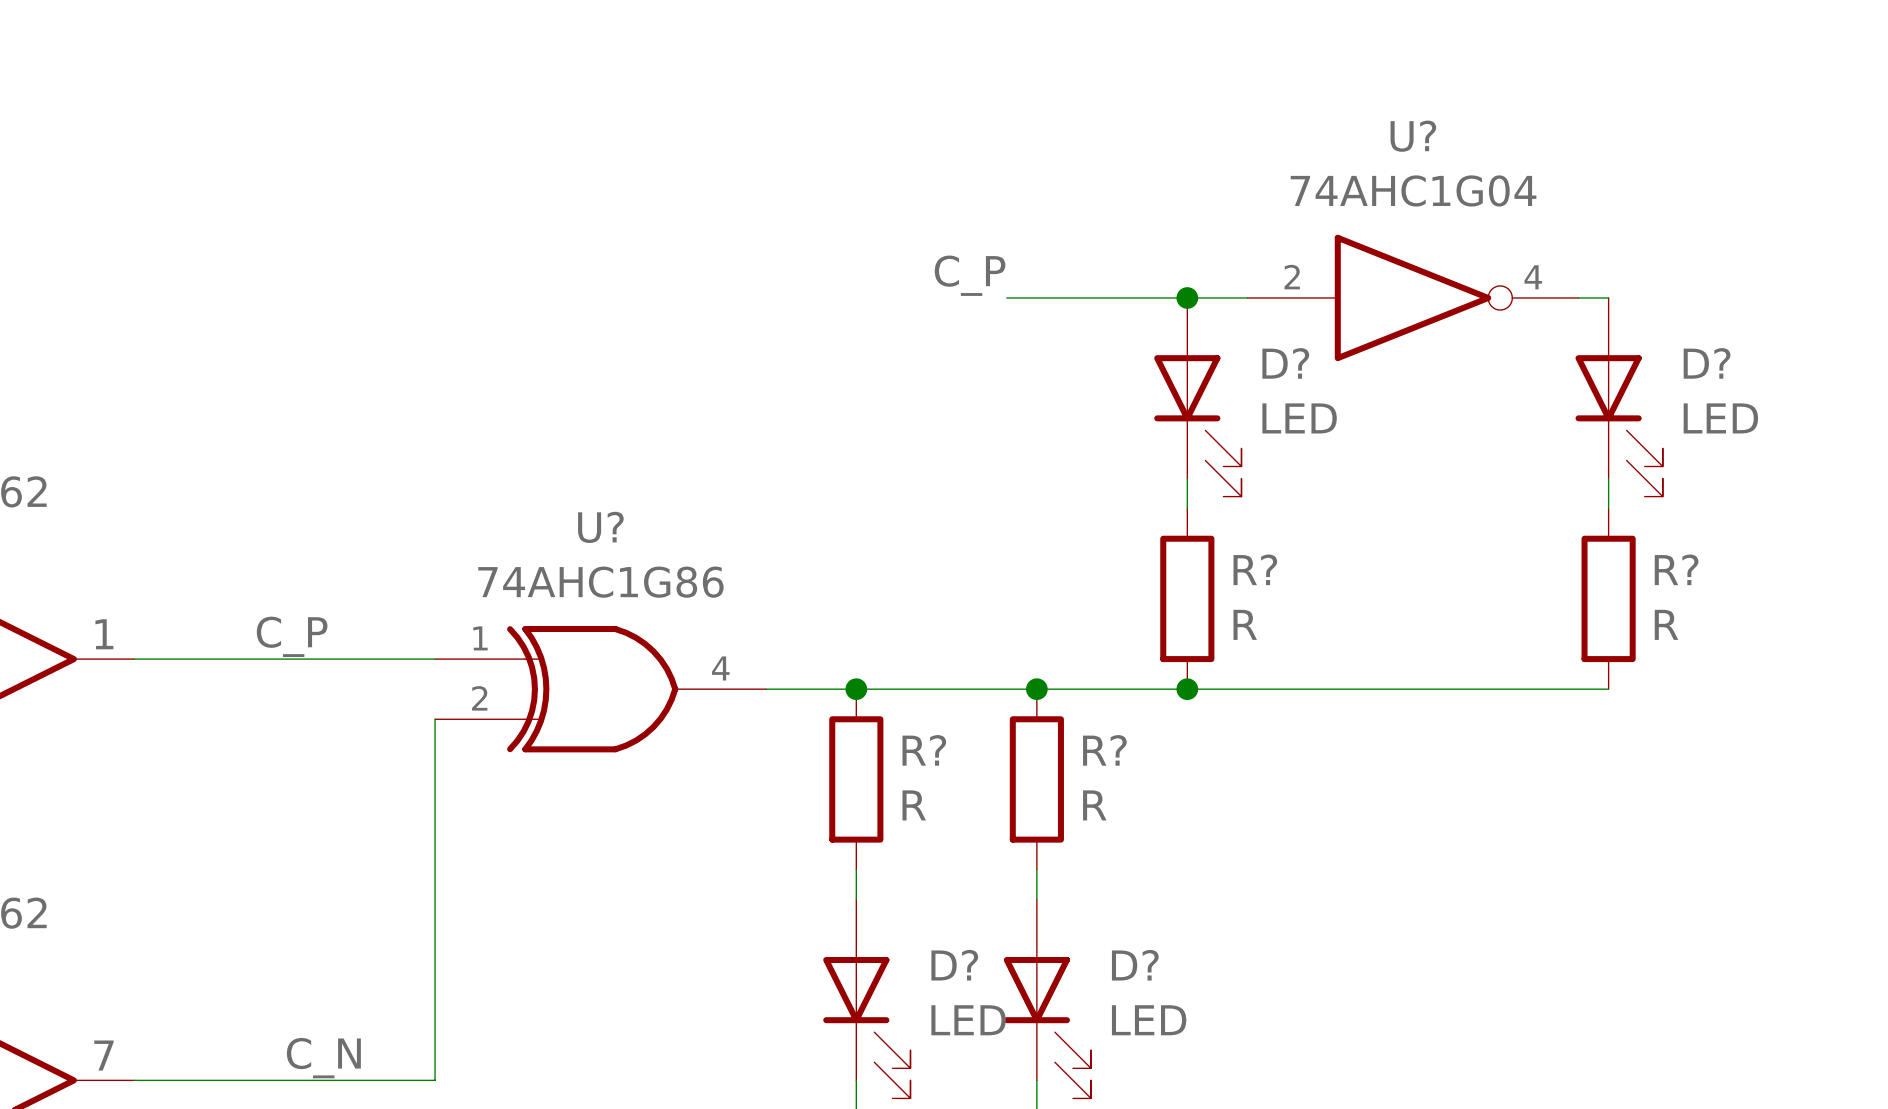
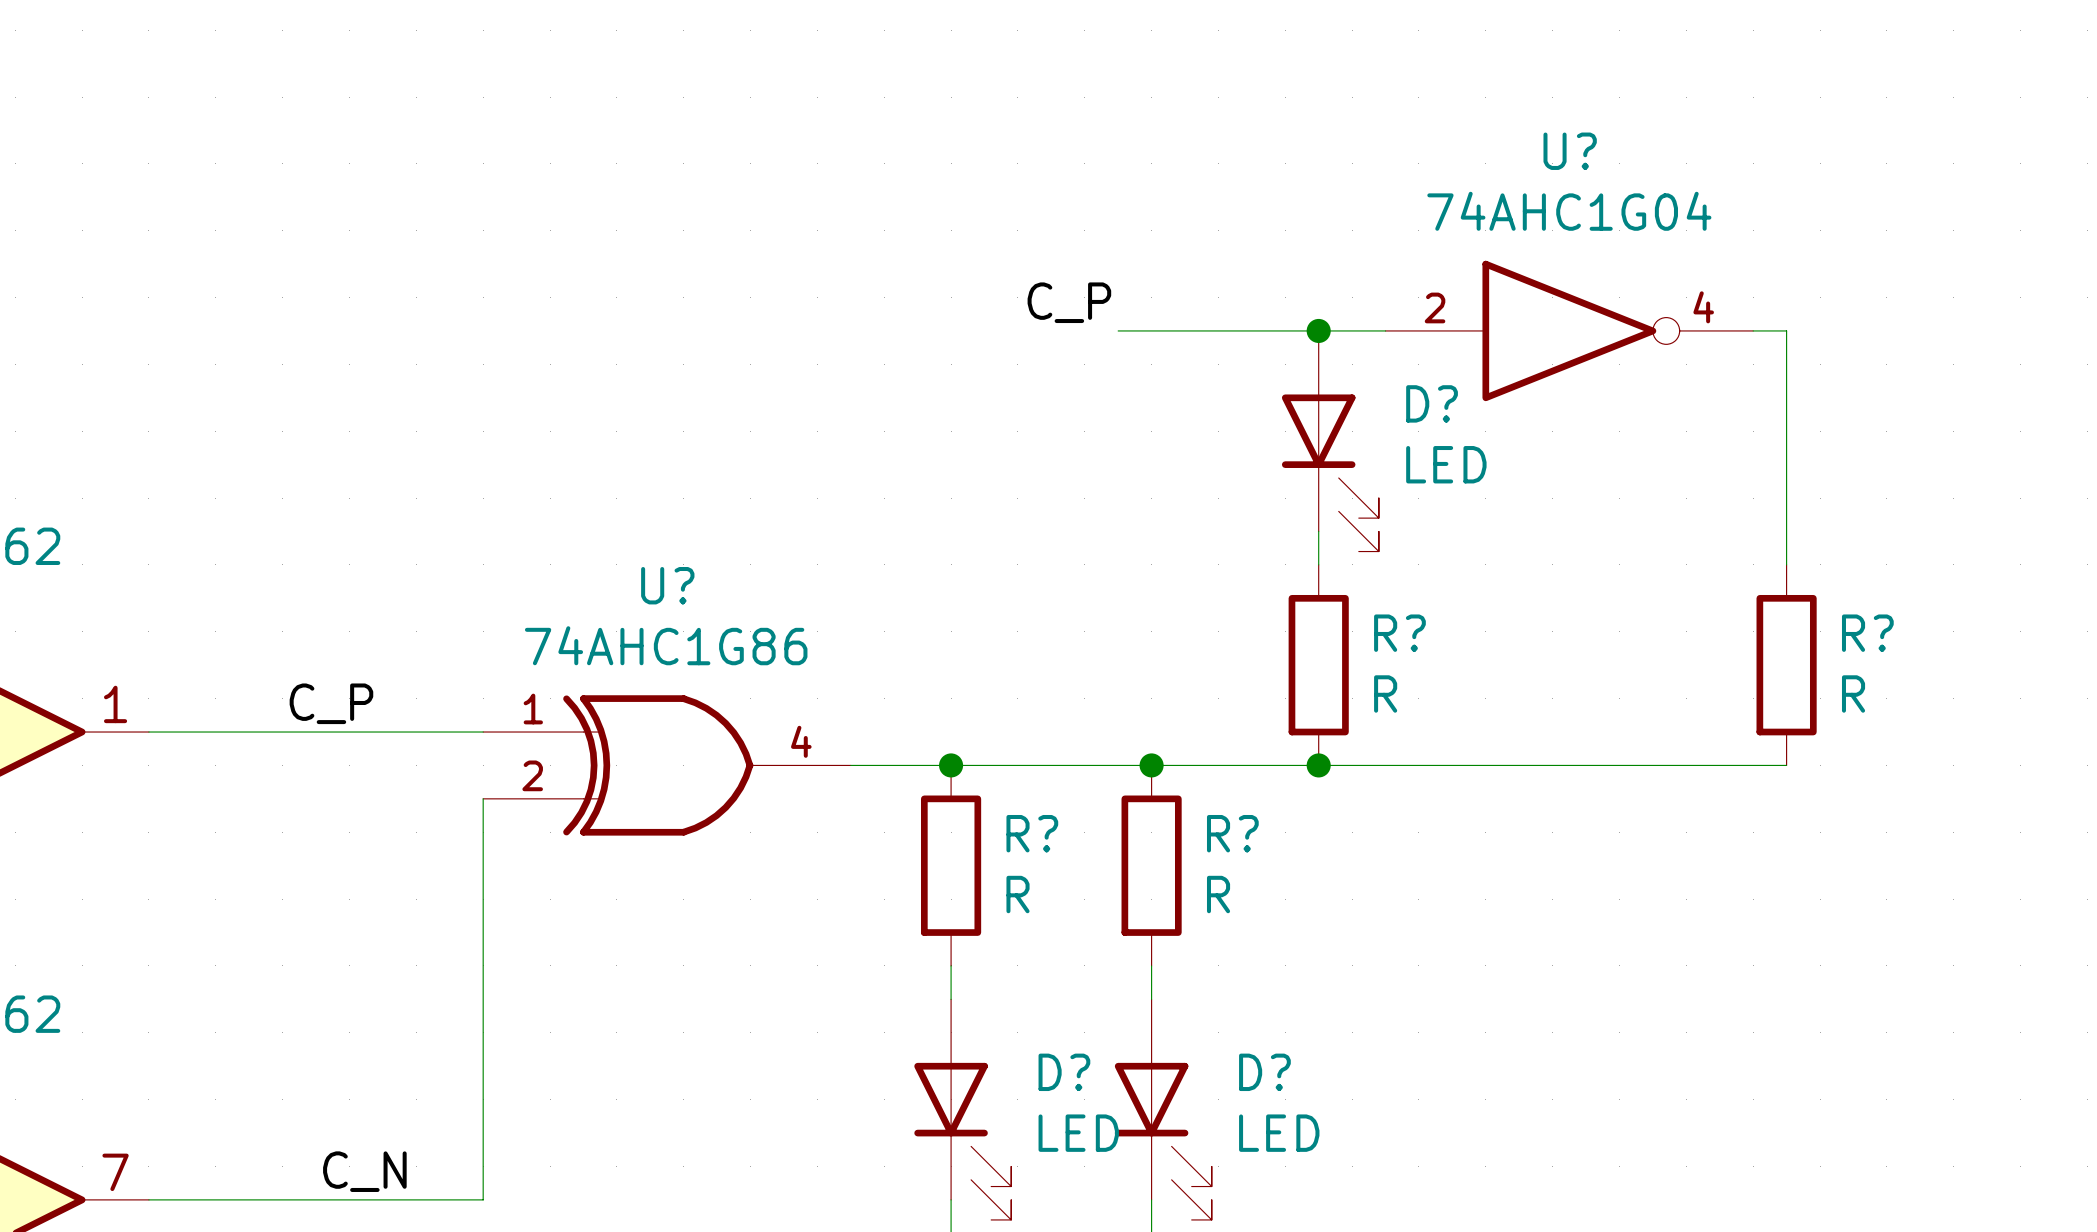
D?: LED (1619, 397) -> none

